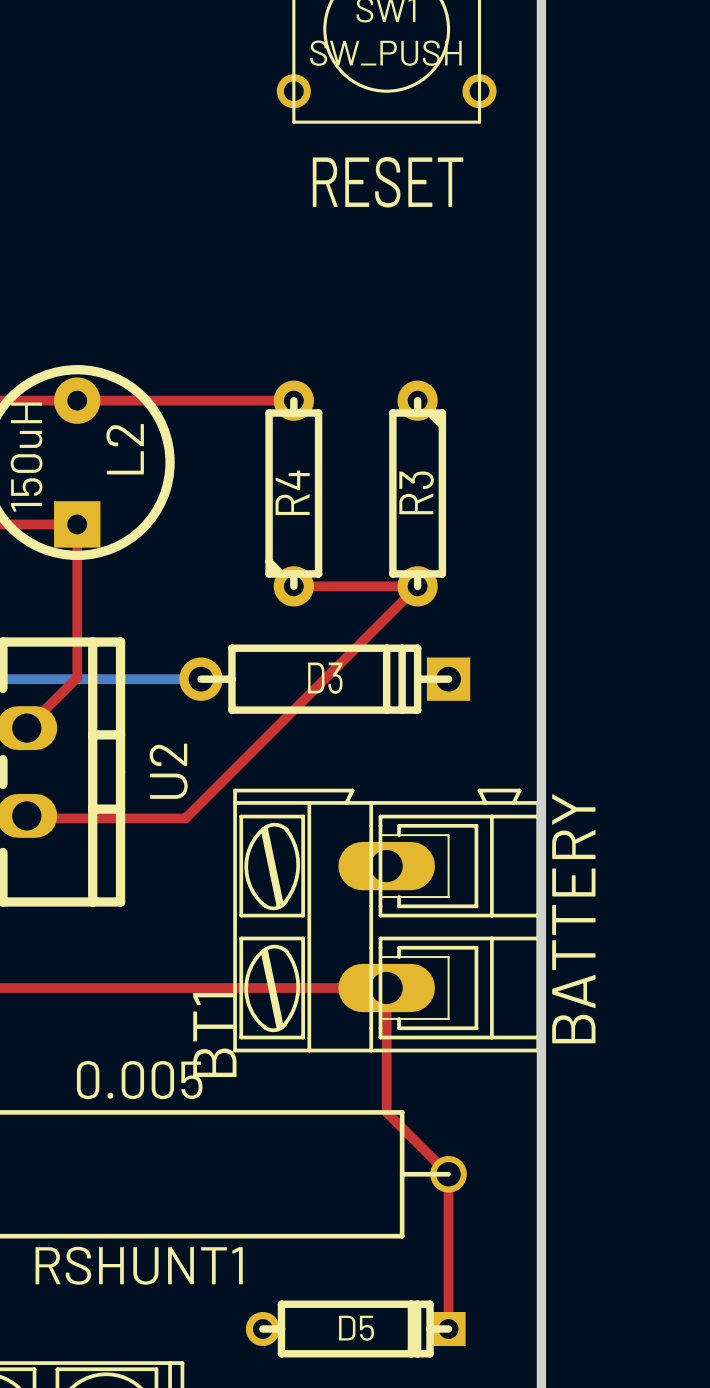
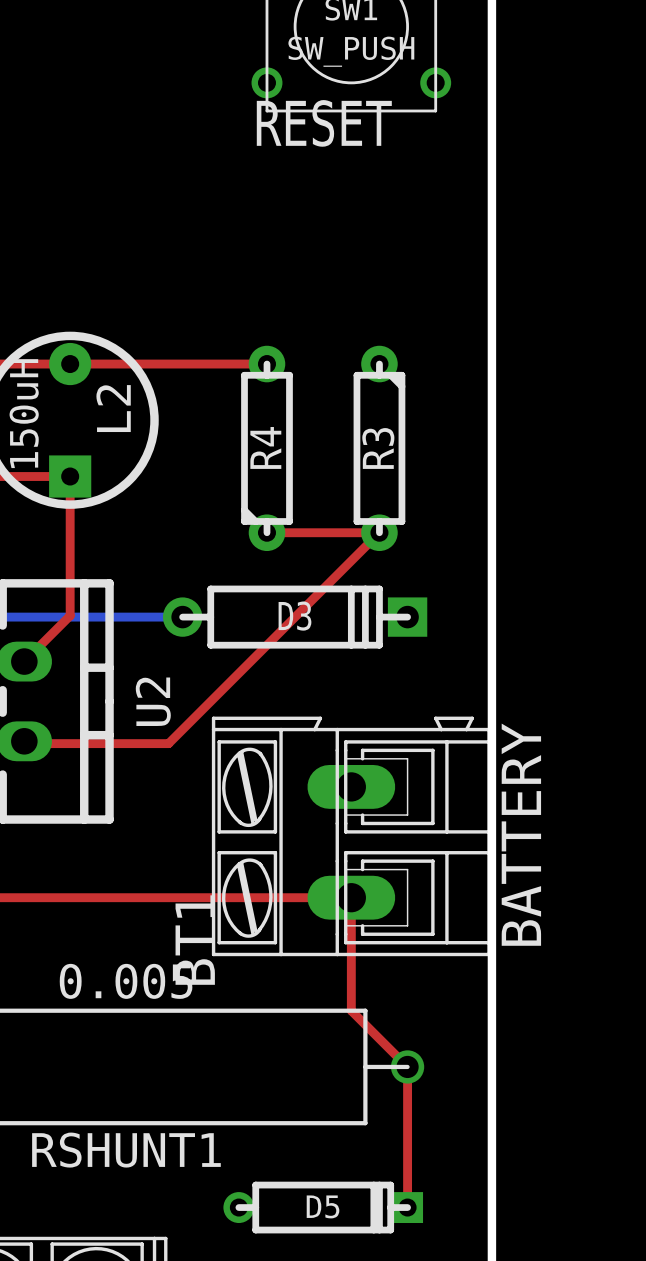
text position: RESET (388, 182) -> RESET (324, 123)

